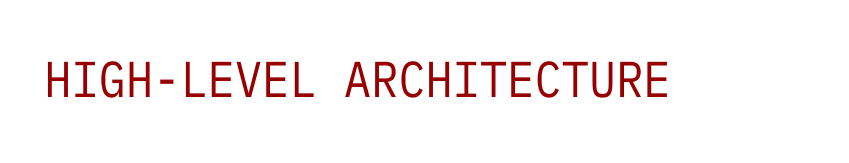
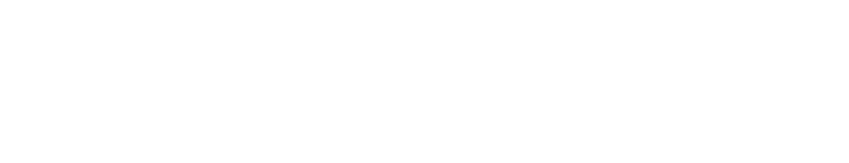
text: HIGH-LEVEL ARCHITECTURE (357, 79) -> none

